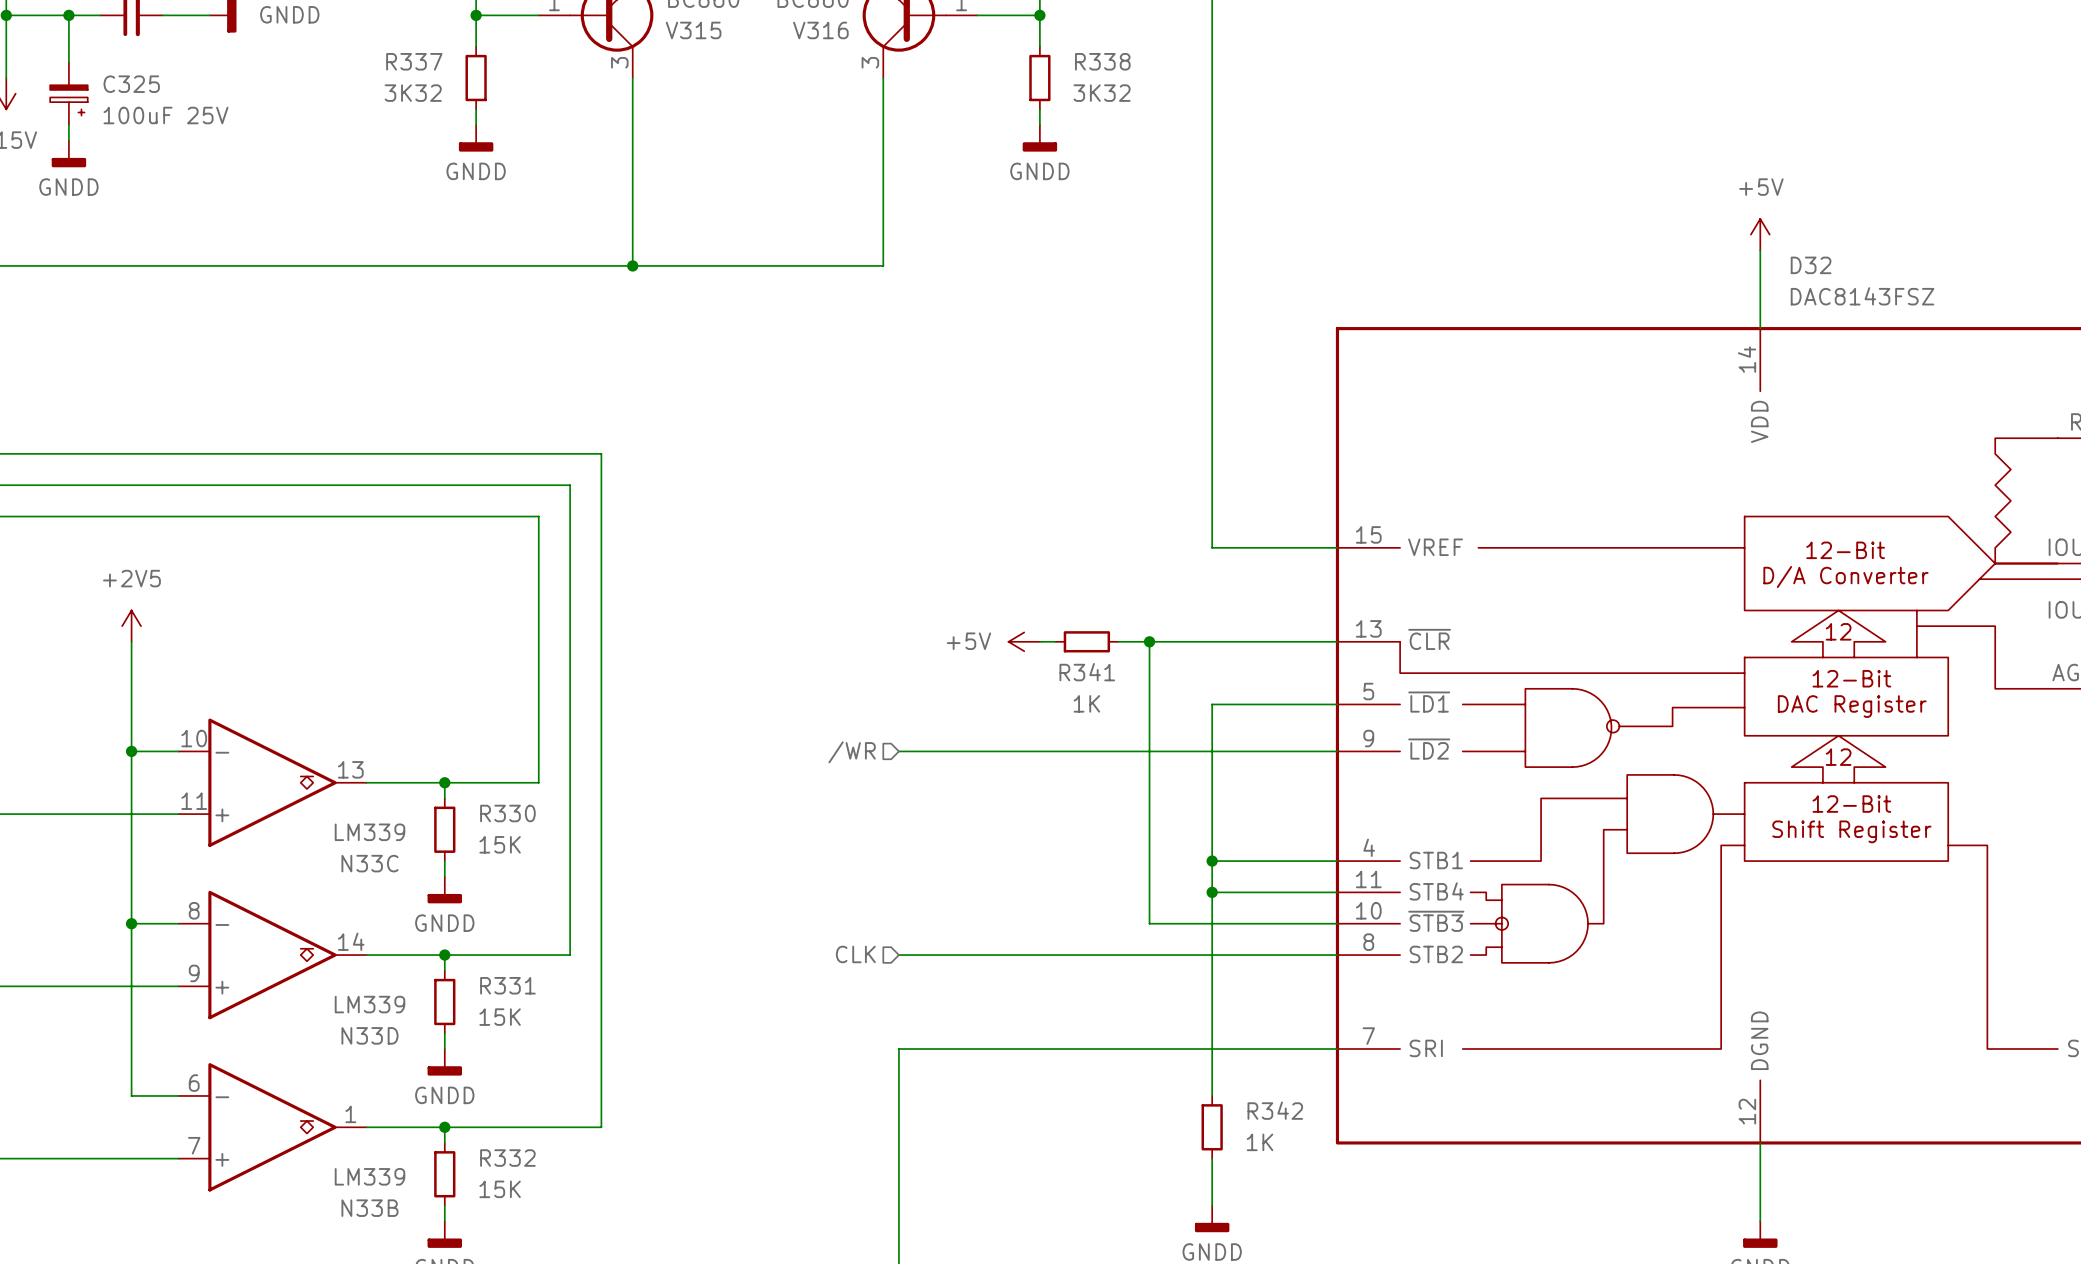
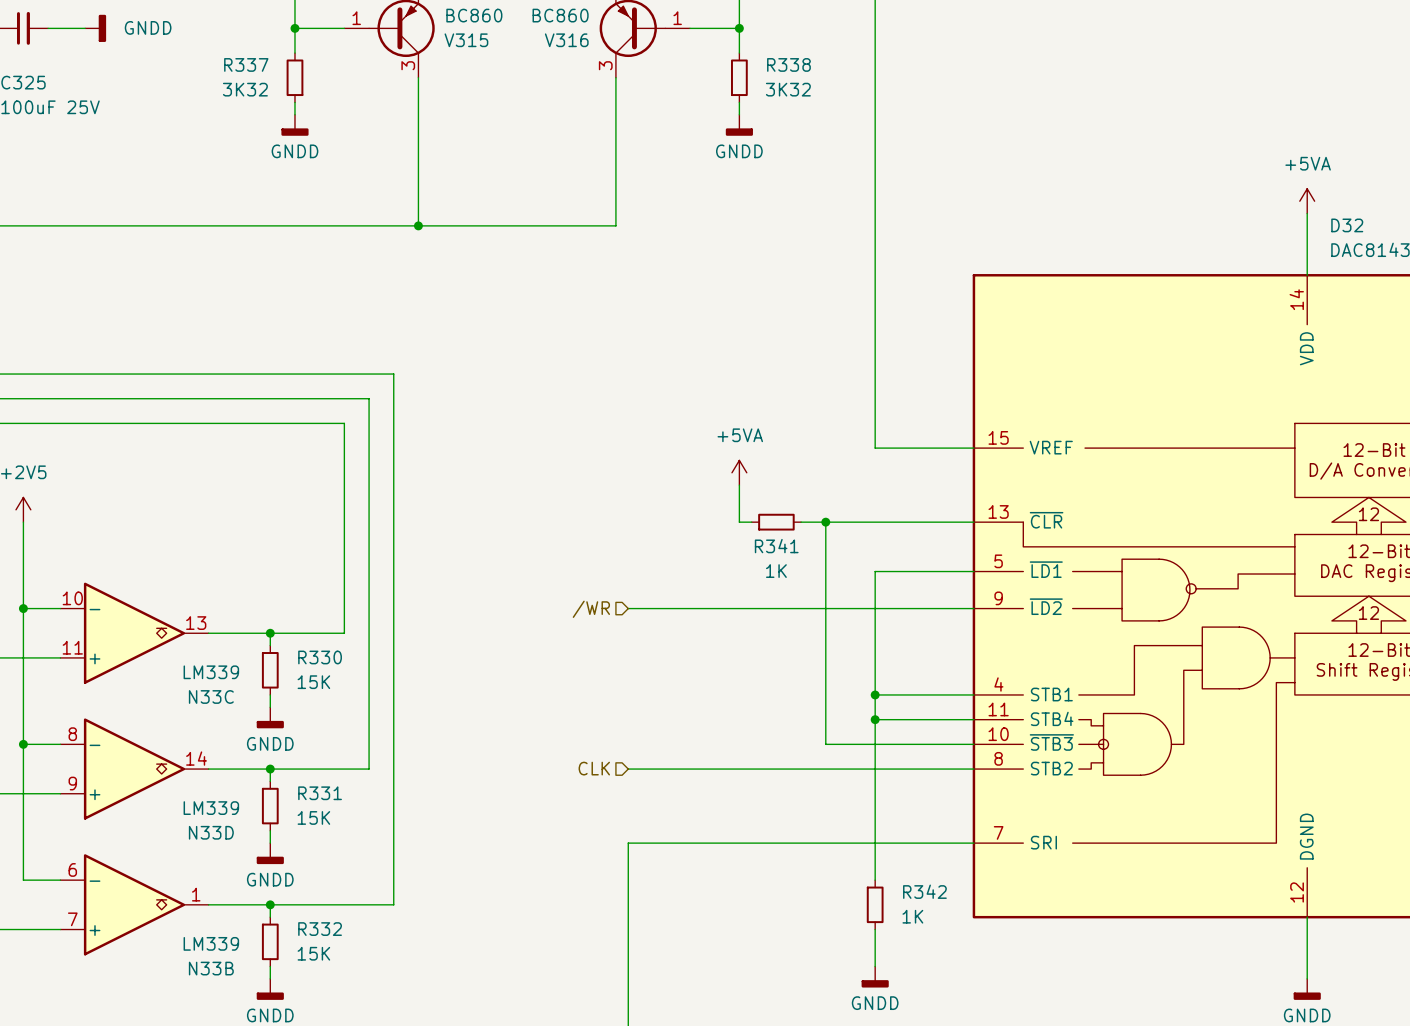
power symbol: +5V (1760, 234) -> +5VA (1307, 201)
power symbol: none -> +5VA (739, 472)
wire: none -> (739, 485) (739, 522)
power symbol: +5V (1024, 641) -> none

